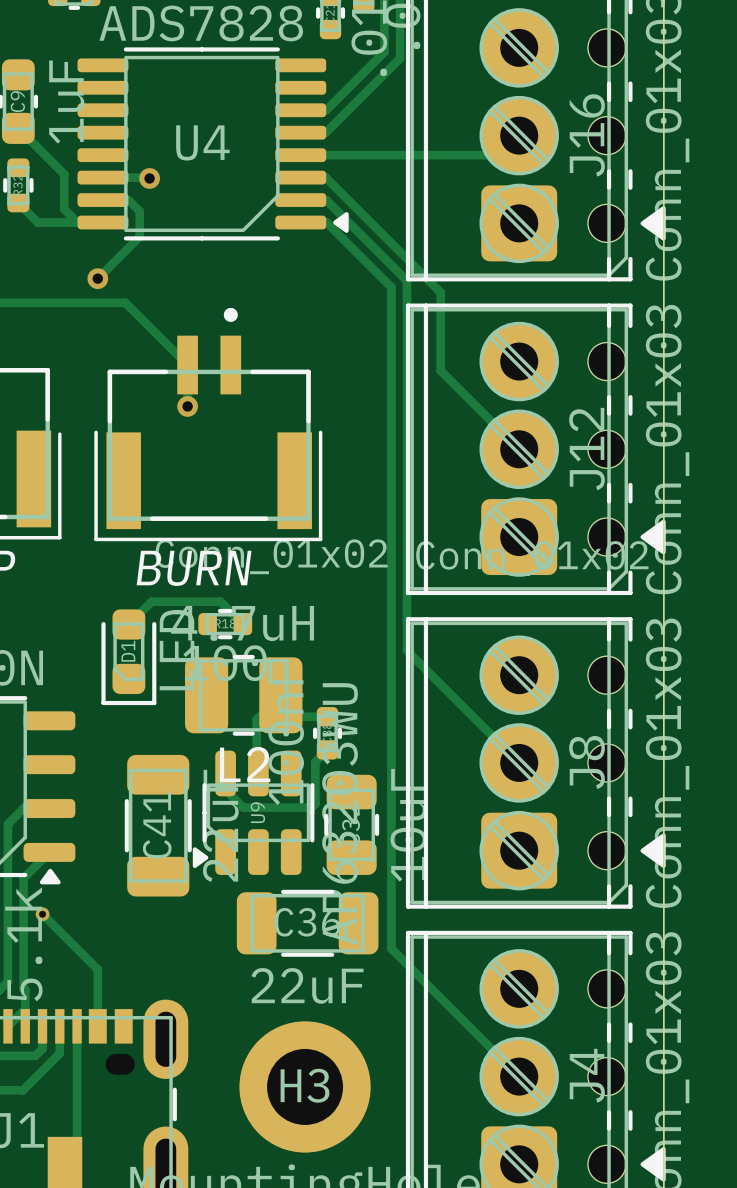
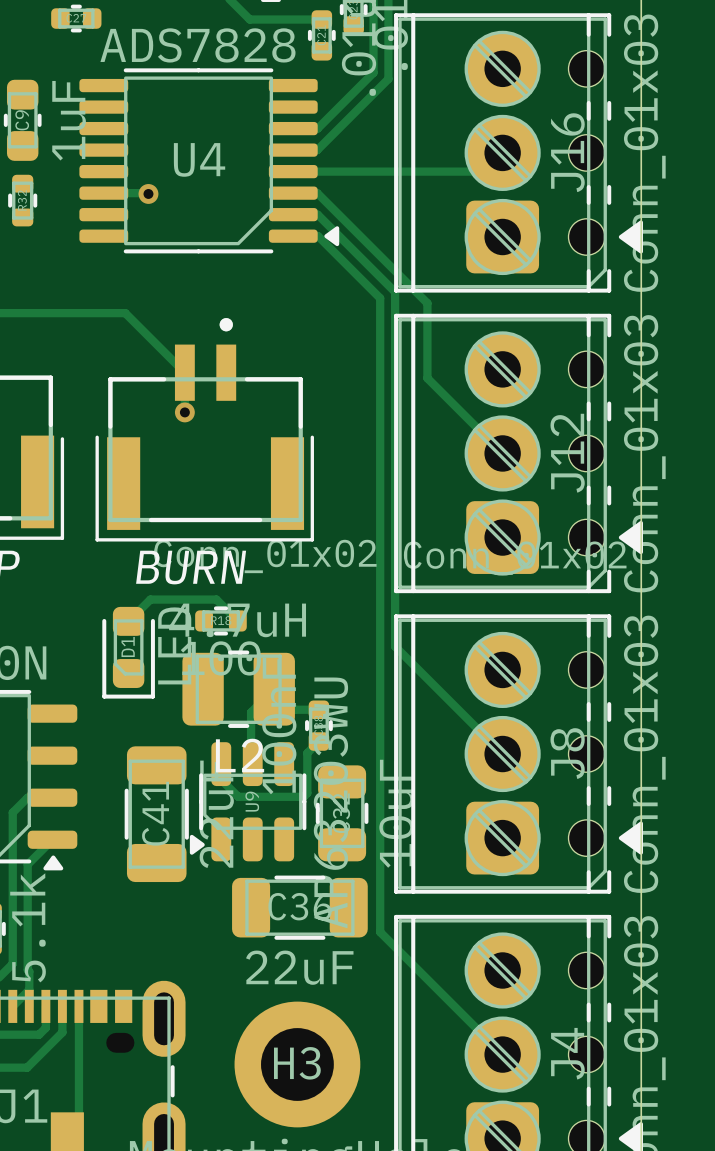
track: (18, 128) (64, 174) (64, 209) (77, 222) -> none
track: (102, 200) (128, 200) (139, 211) (139, 236) (97, 278) -> none
track: (18, 203) (37, 222) (102, 222) -> none
via: (97, 278) -> none
track: (42, 914) (97, 969) (97, 1026) -> none
via: (42, 914) -> none

